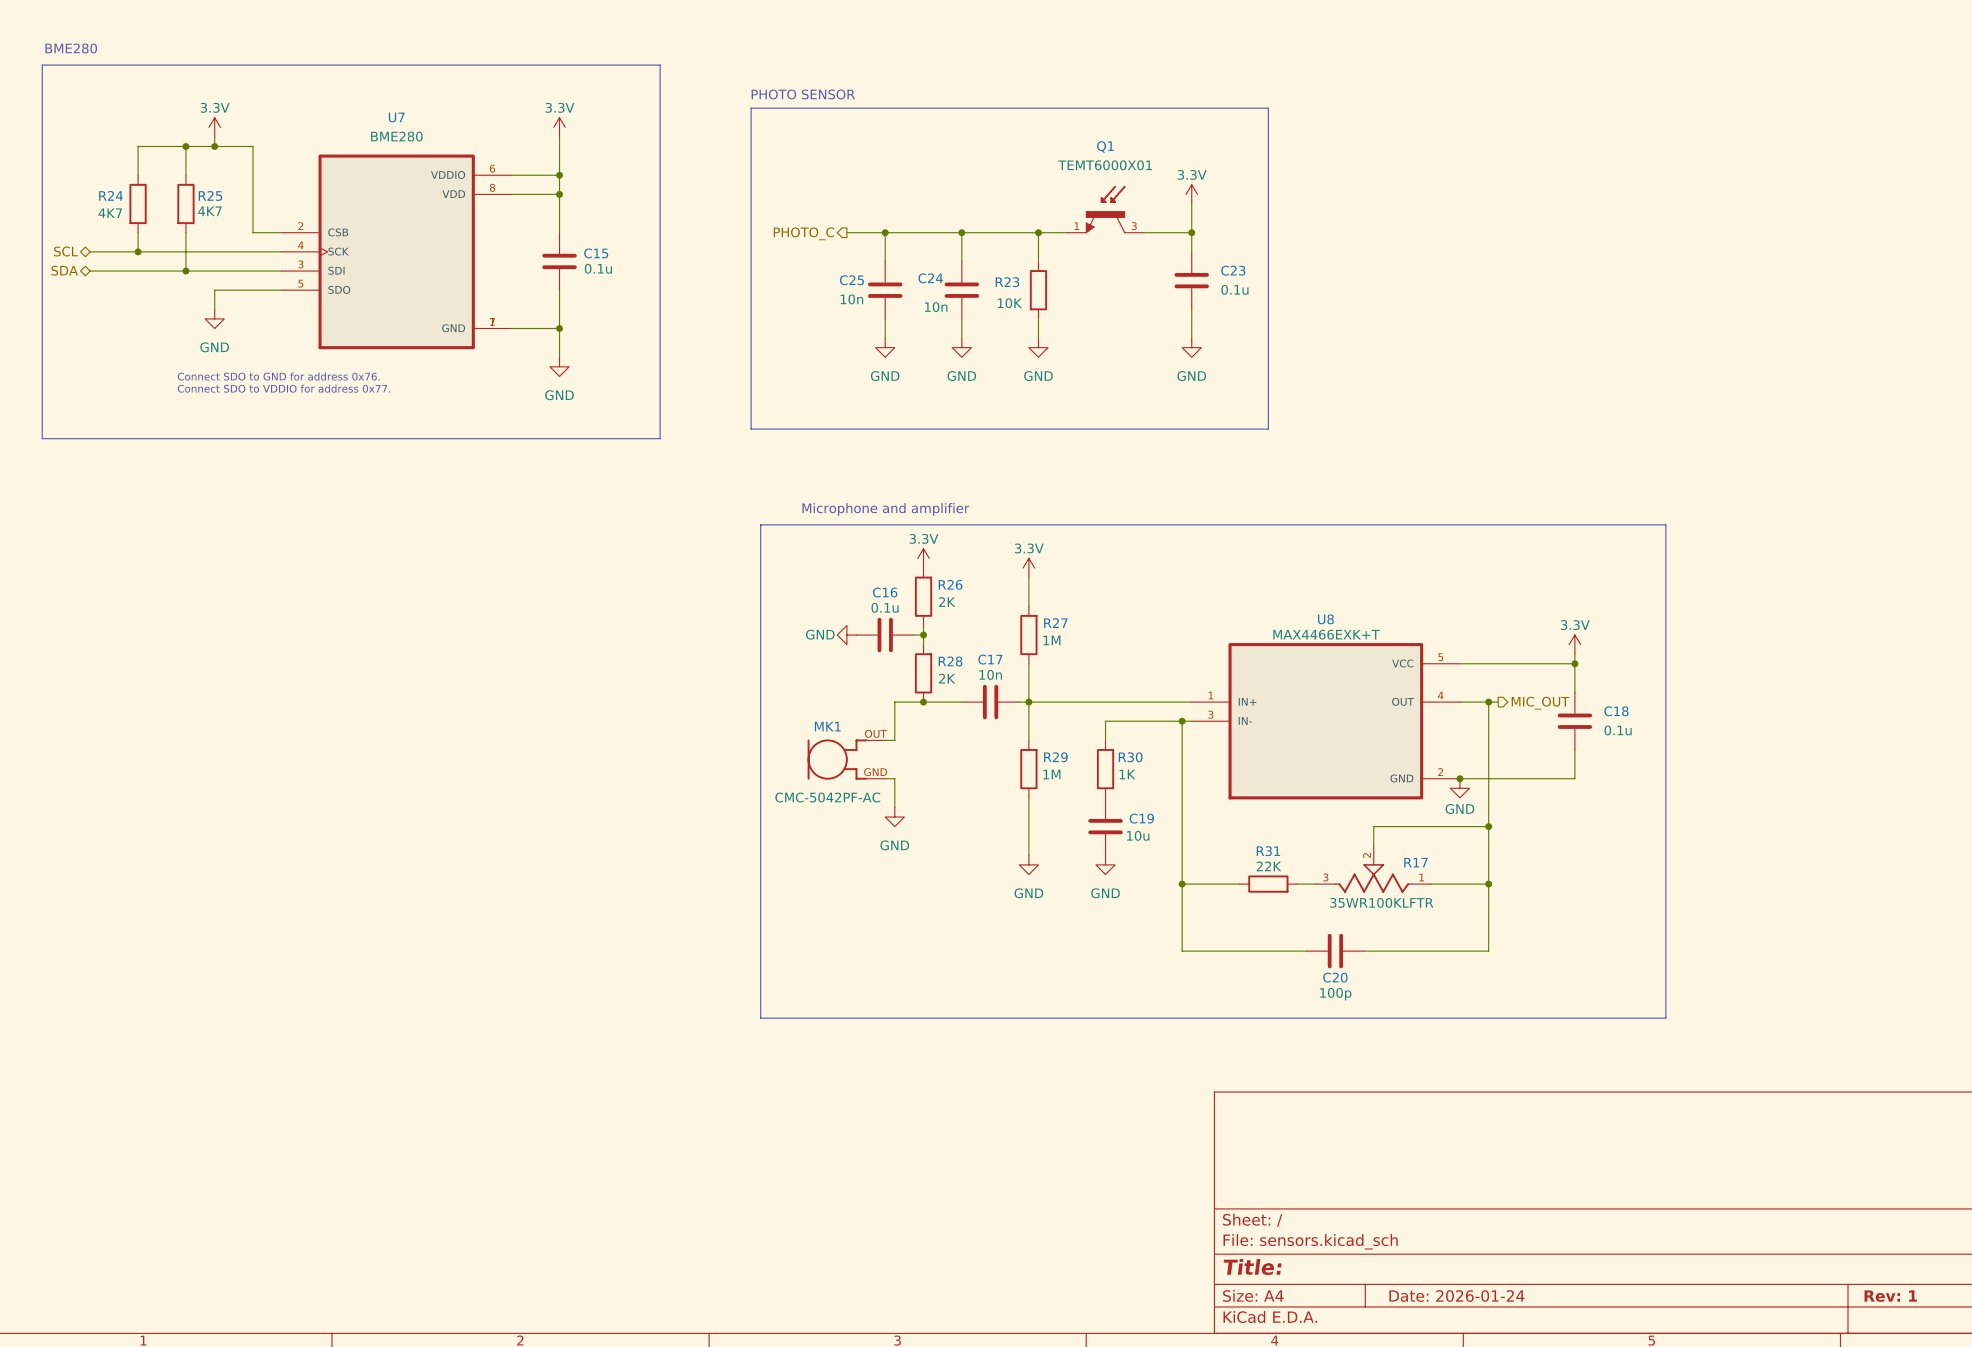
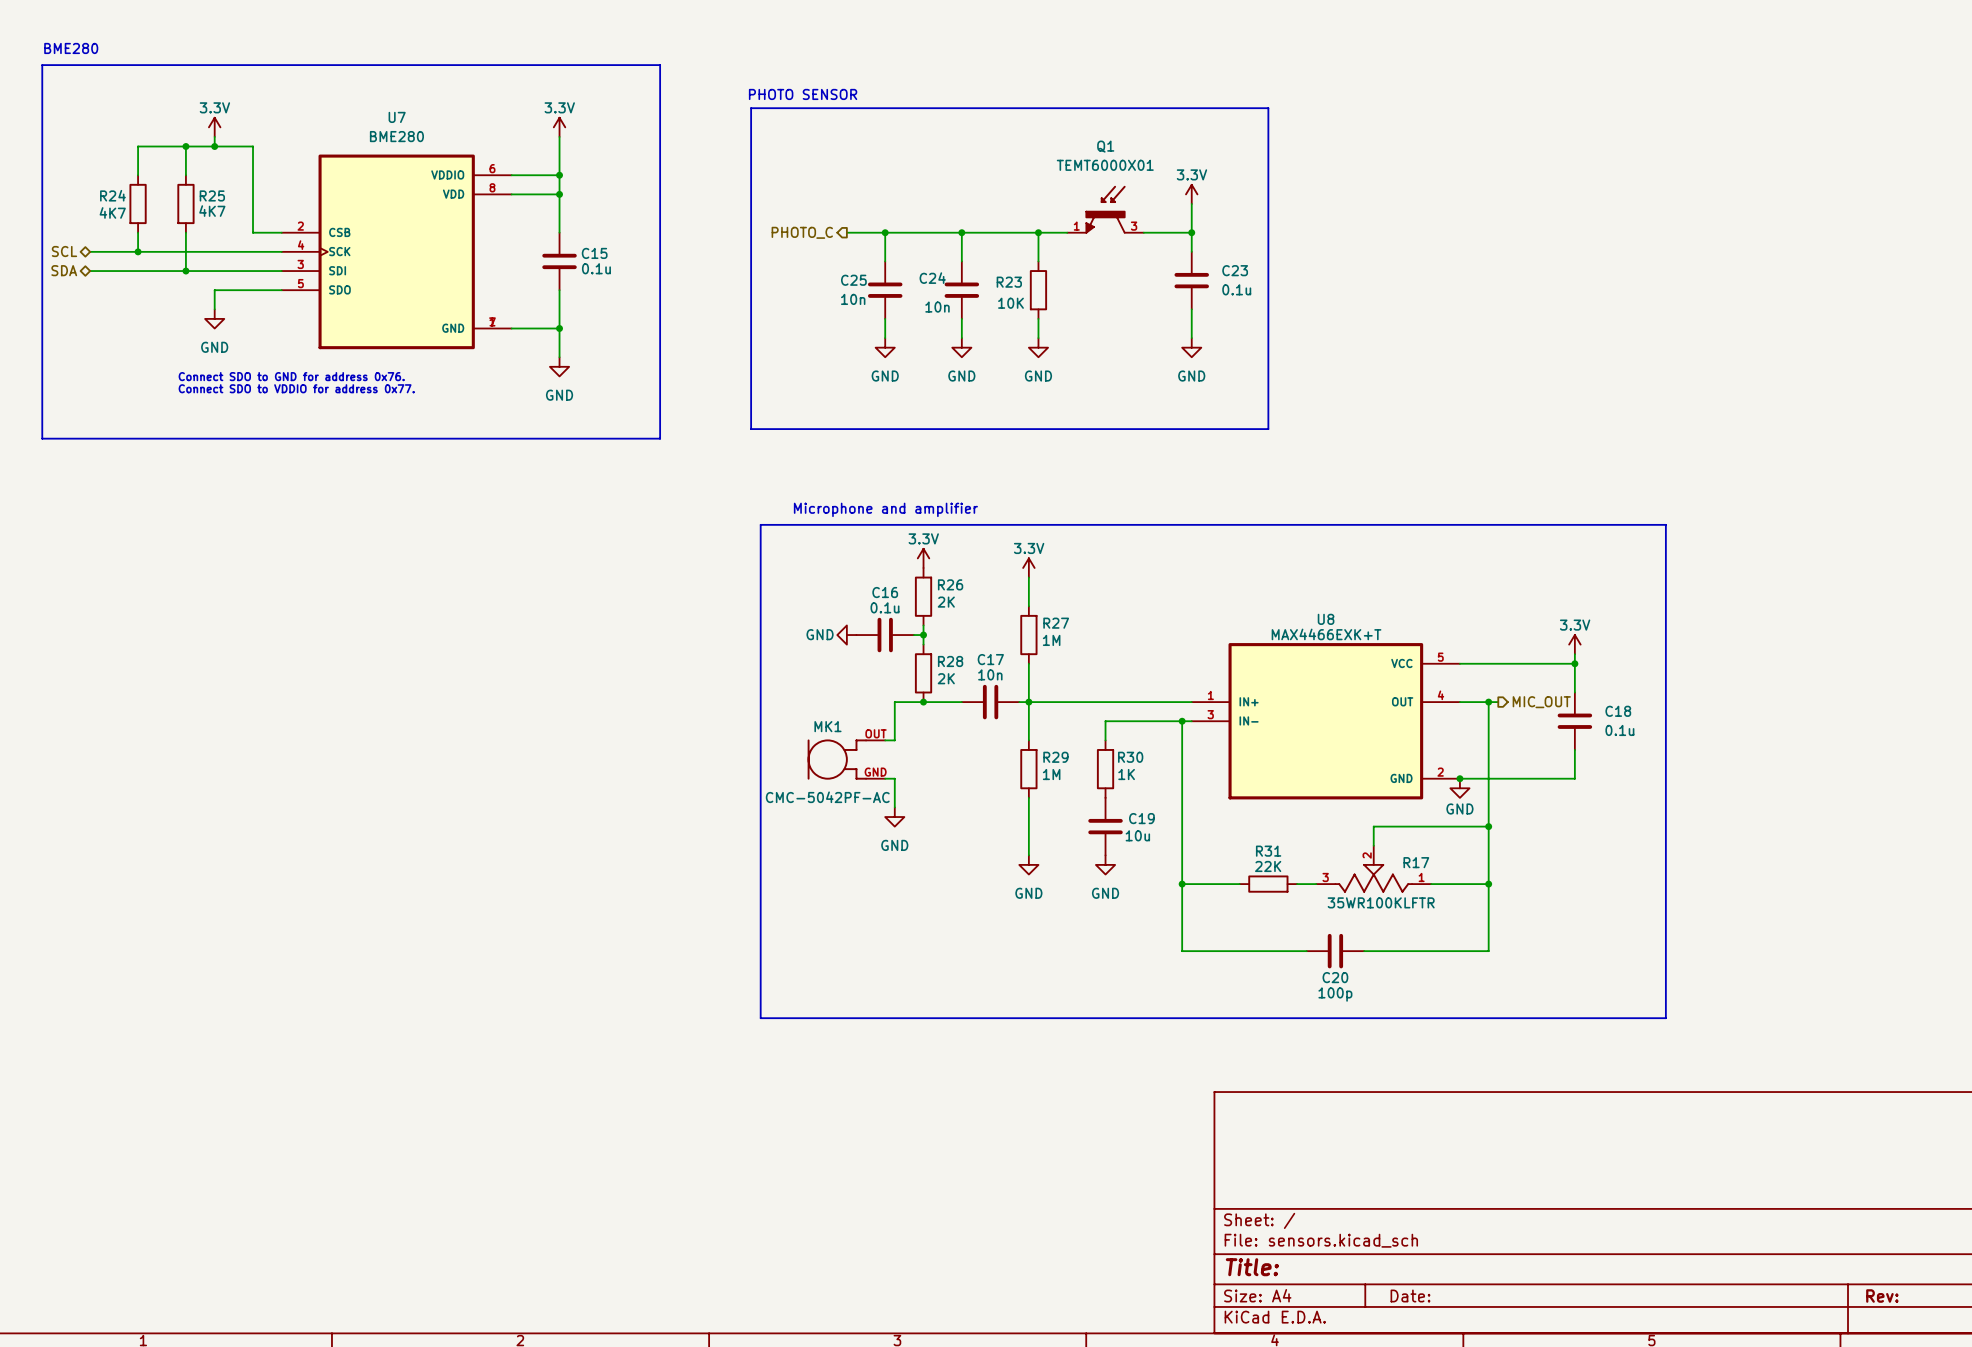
title block: Date: 2026-01-24 (1456, 1296) -> Date: (1410, 1296)
title block: Rev: 1 (1890, 1296) -> Rev: (1882, 1296)

